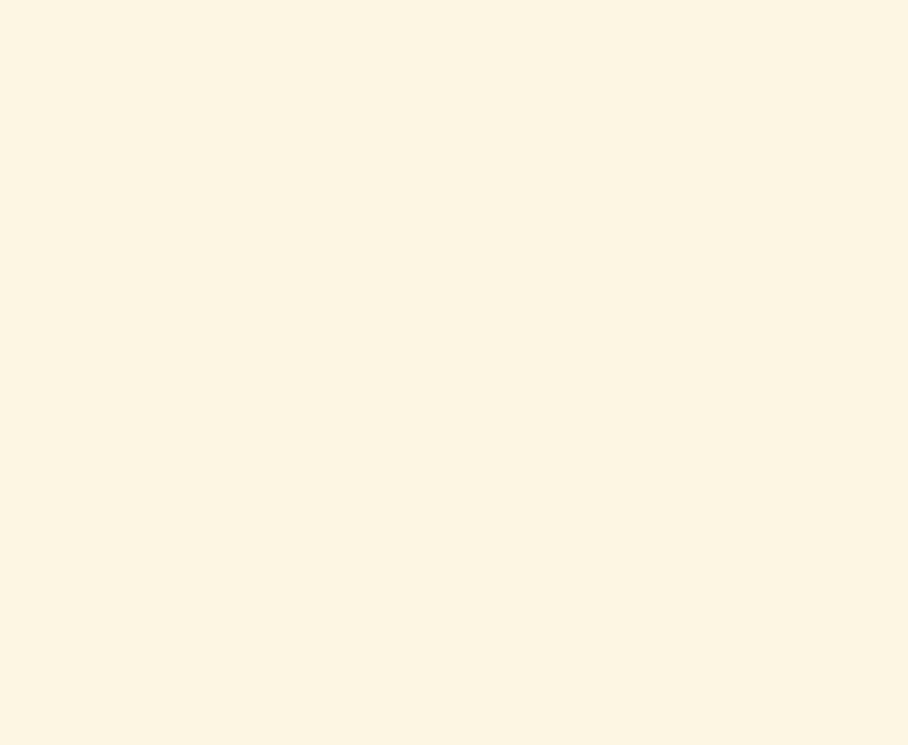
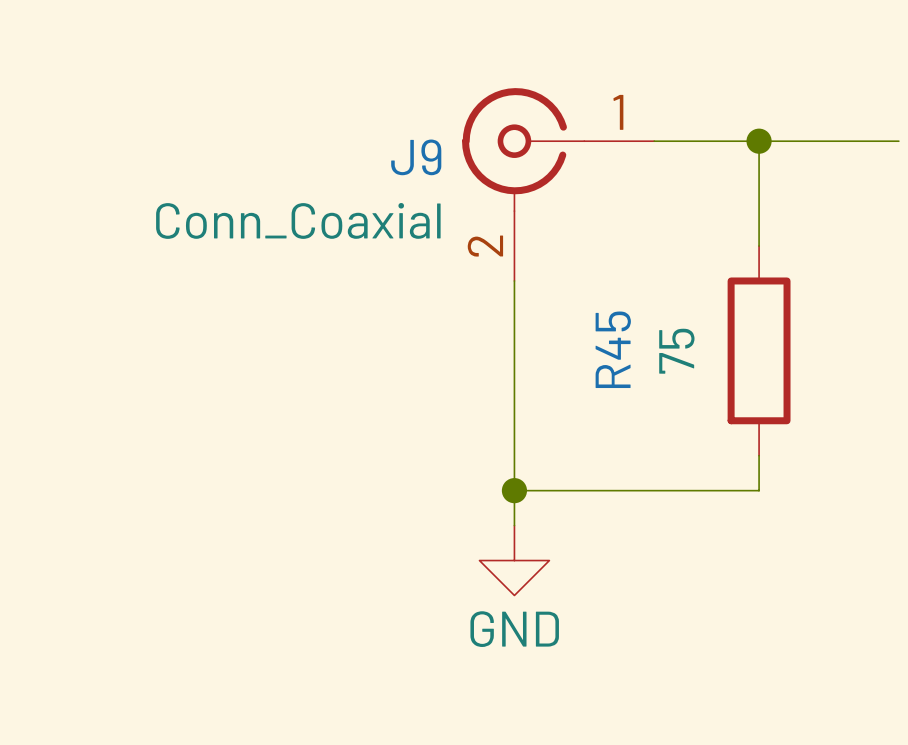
wire: none -> (654, 141) (898, 141)
wire: none -> (759, 141) (759, 246)
junction: none -> (759, 141)
J9: none -> Conn_Coaxial (558, 184)
wire: none -> (514, 280) (514, 525)
R45: none -> 75 (759, 350)
wire: none -> (759, 455) (759, 490) (514, 490)
junction: none -> (514, 490)
power symbol: none -> GND (514, 560)

